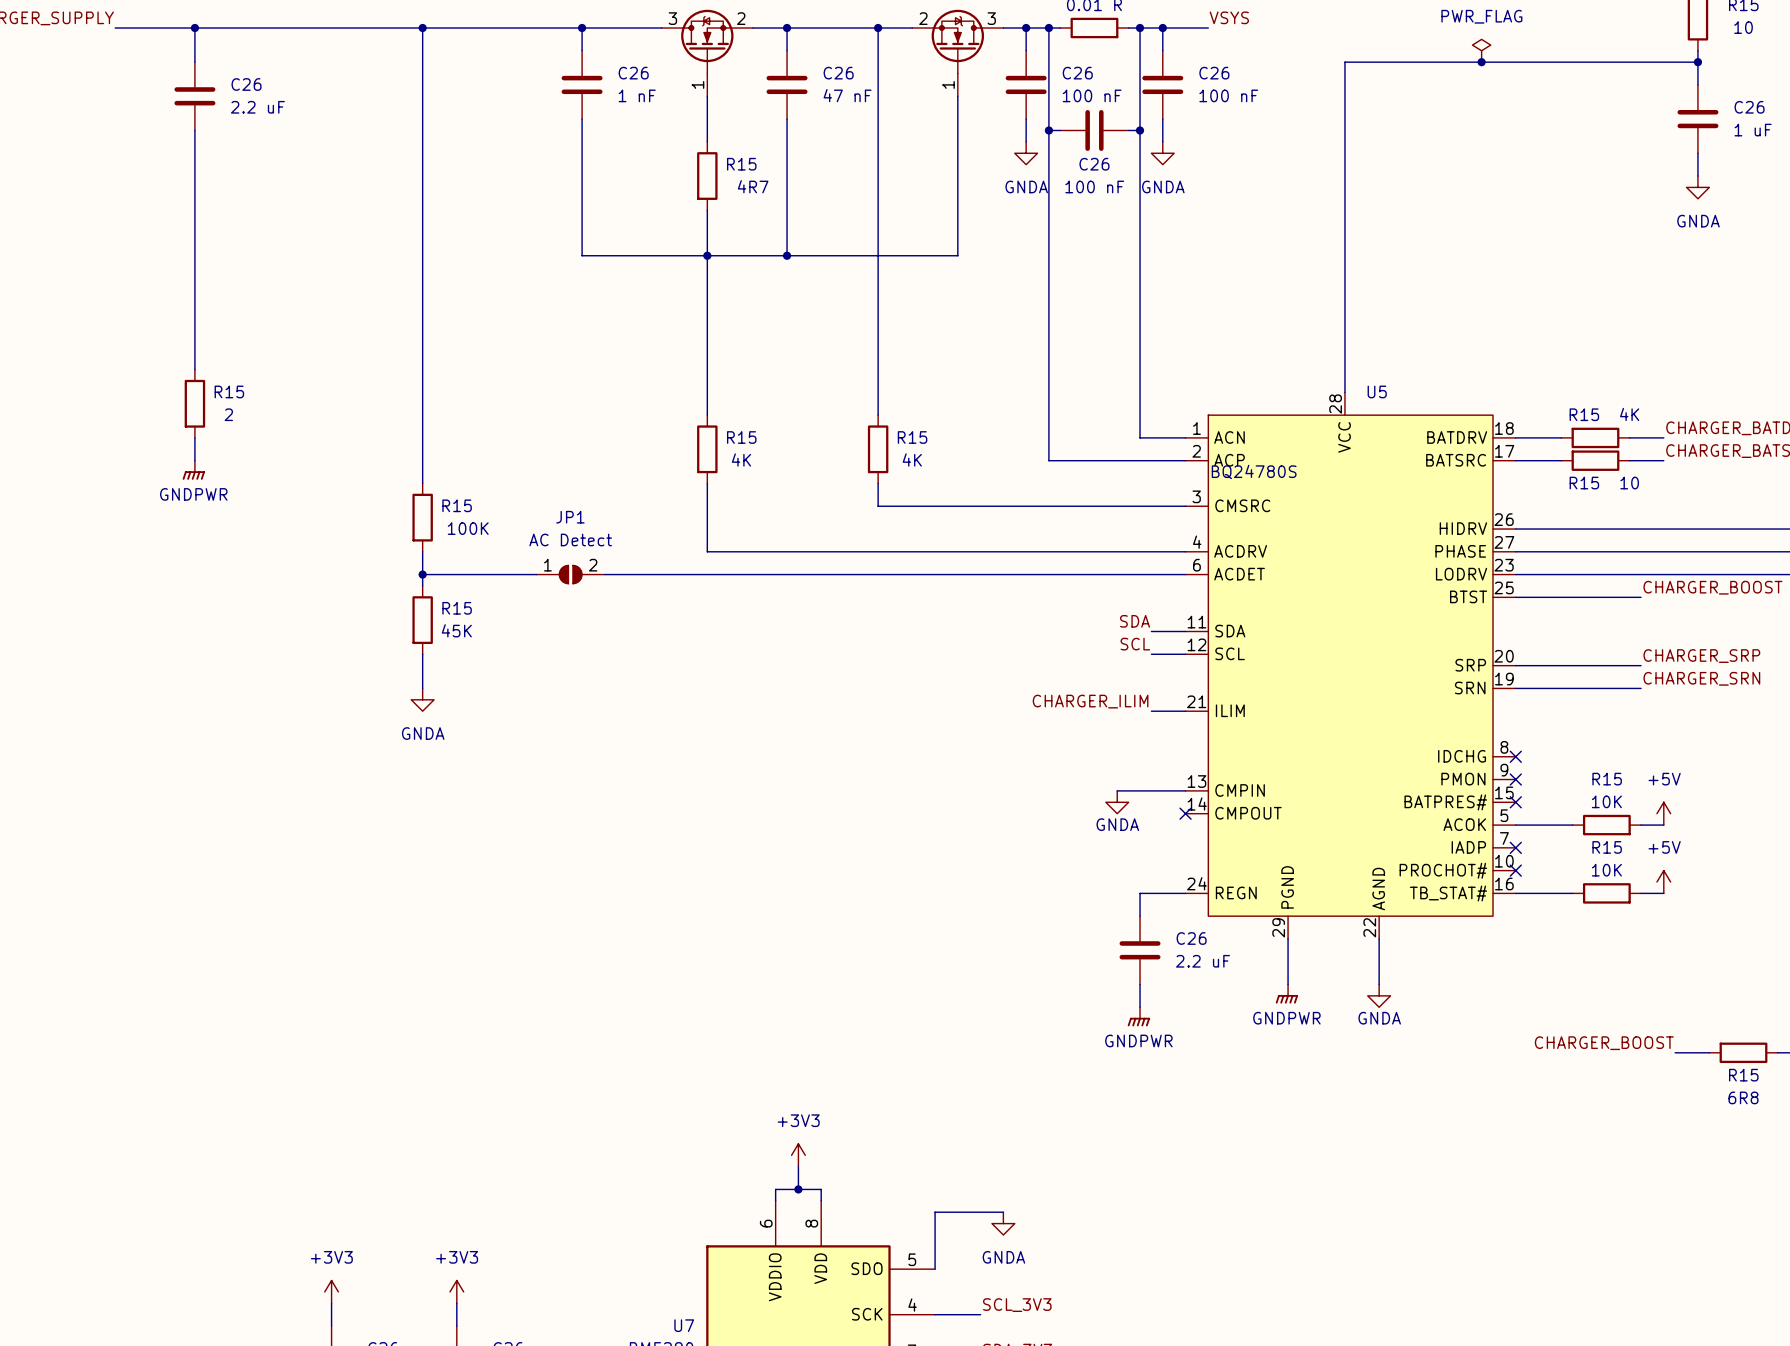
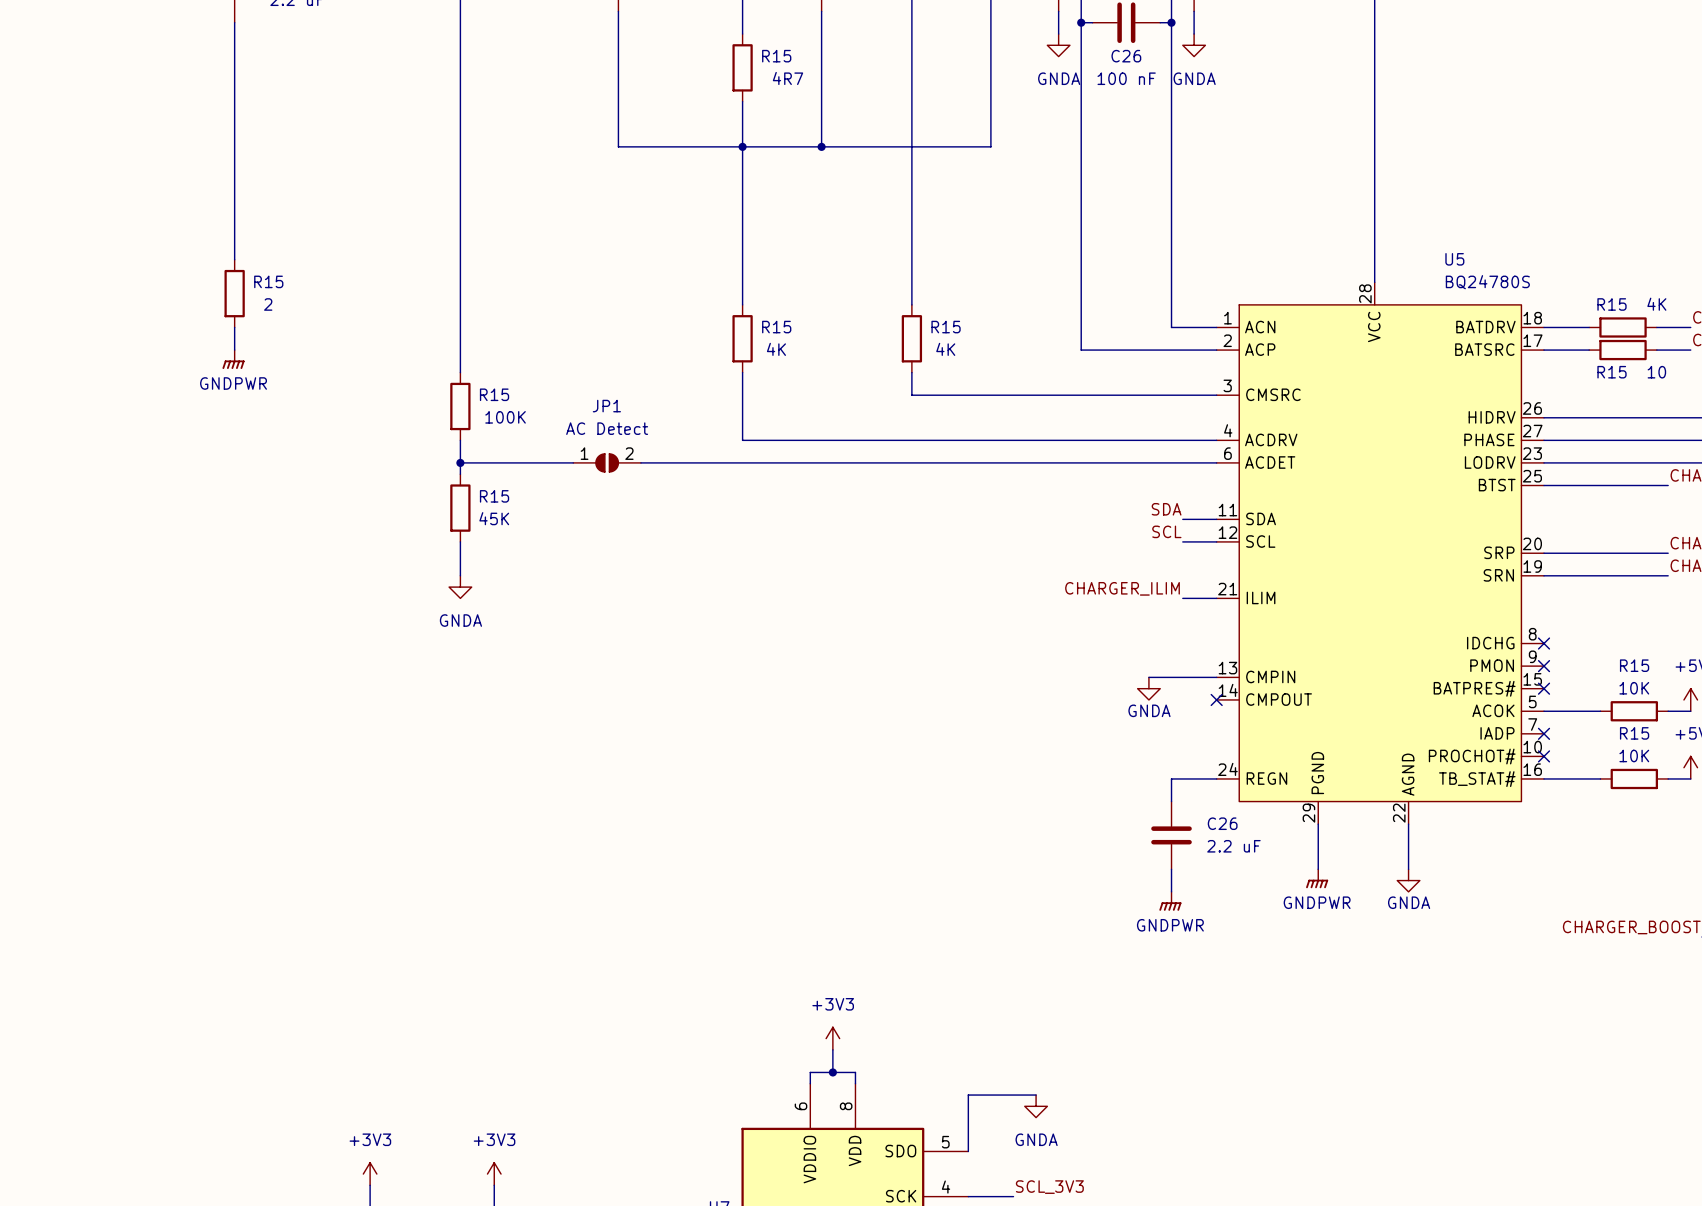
U5 name position: U5 (1377, 391) -> U5 (1454, 259)
U5 value position: BQ24780S (1254, 471) -> BQ24780S (1487, 282)

